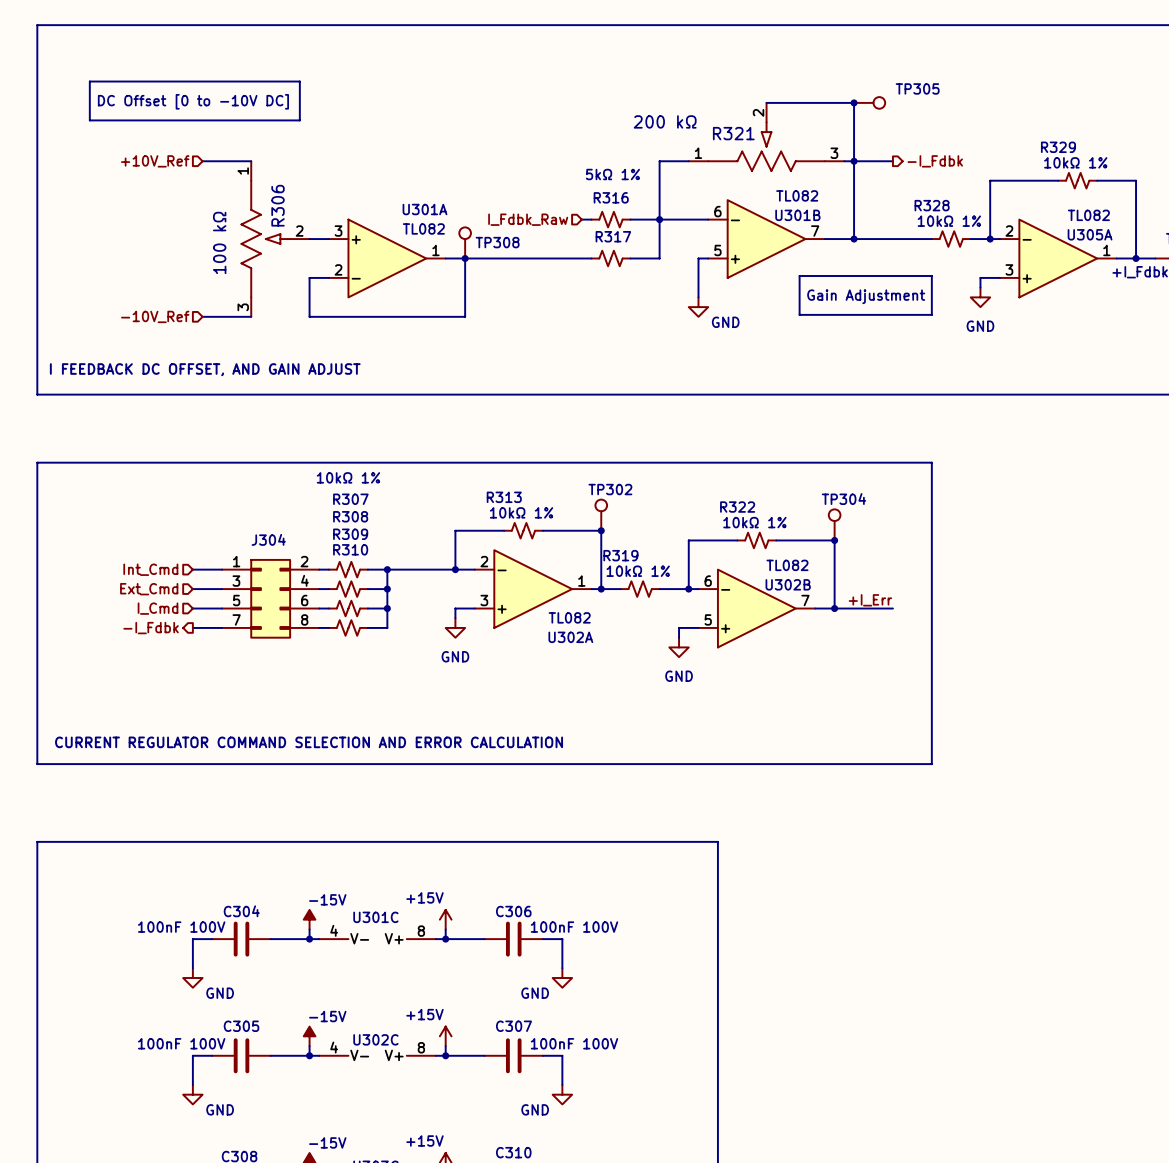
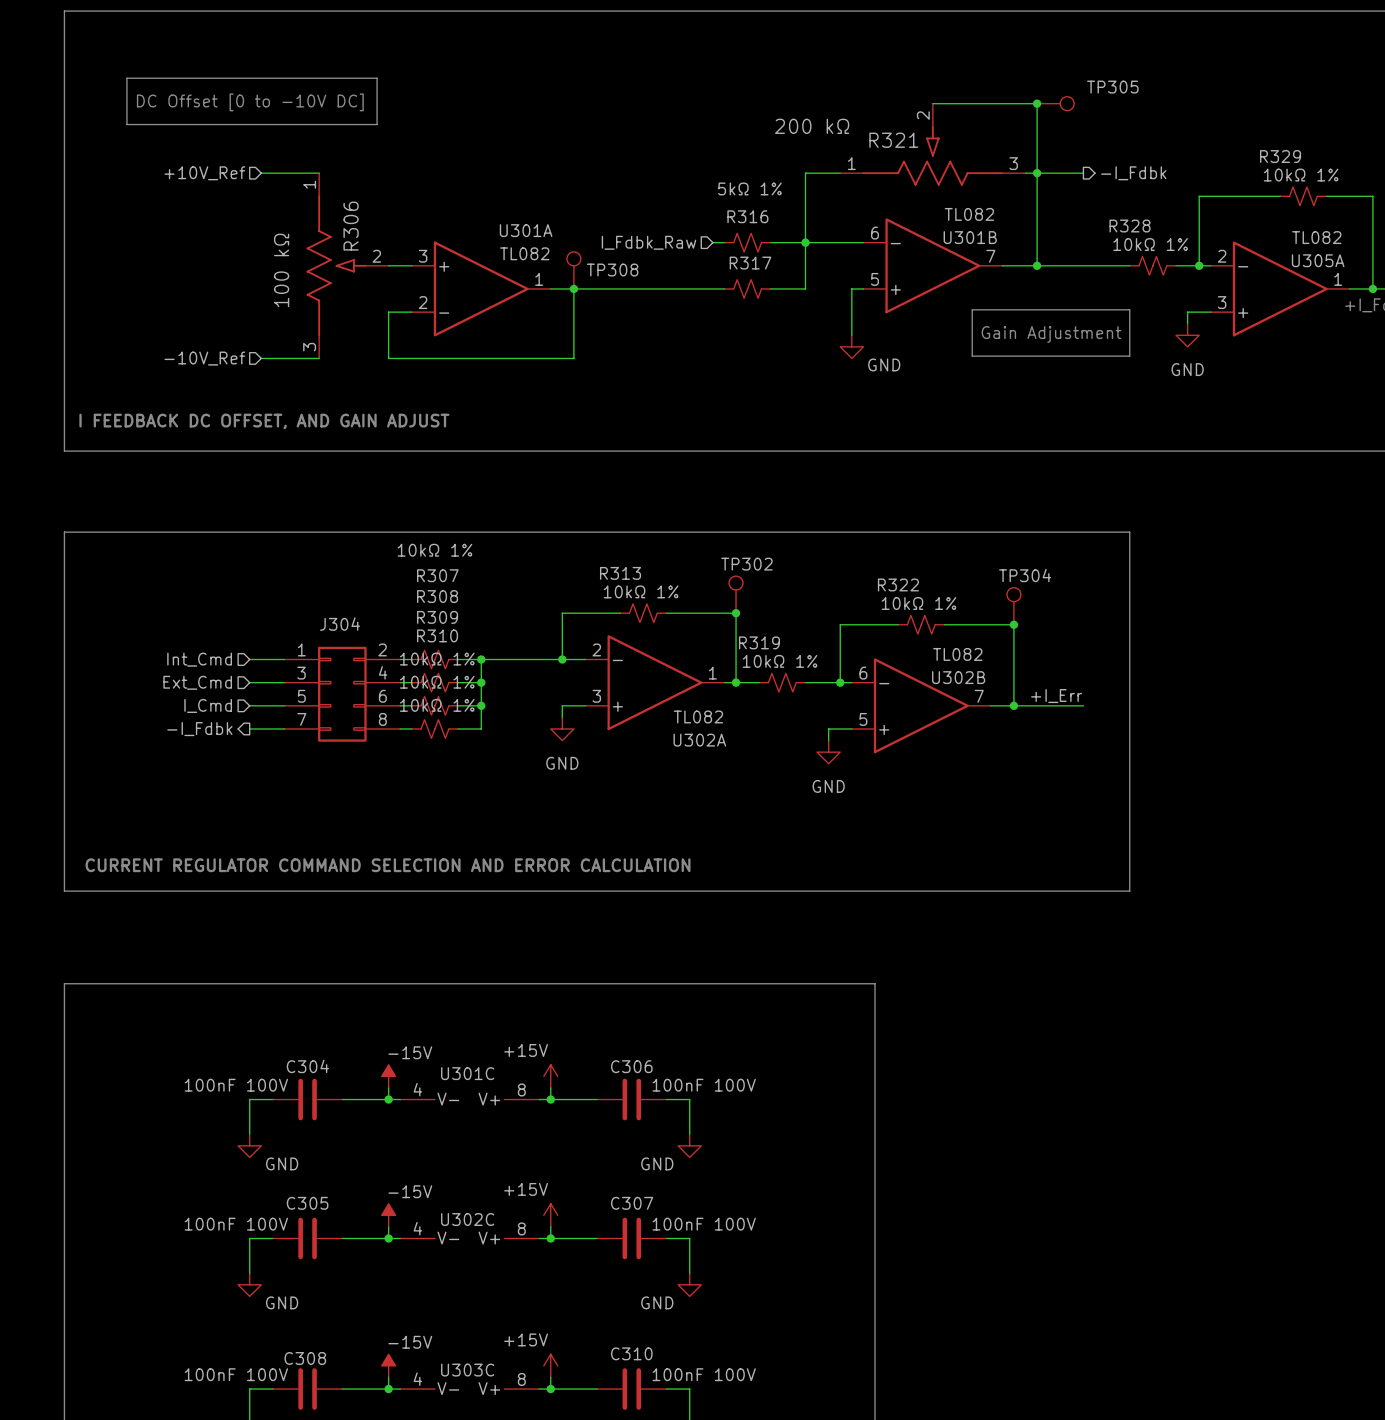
R308 value: none -> 10kΩ 1% (437, 659)
R309 value: none -> 10kΩ 1% (437, 682)
R310 value: none -> 10kΩ 1% (437, 705)

